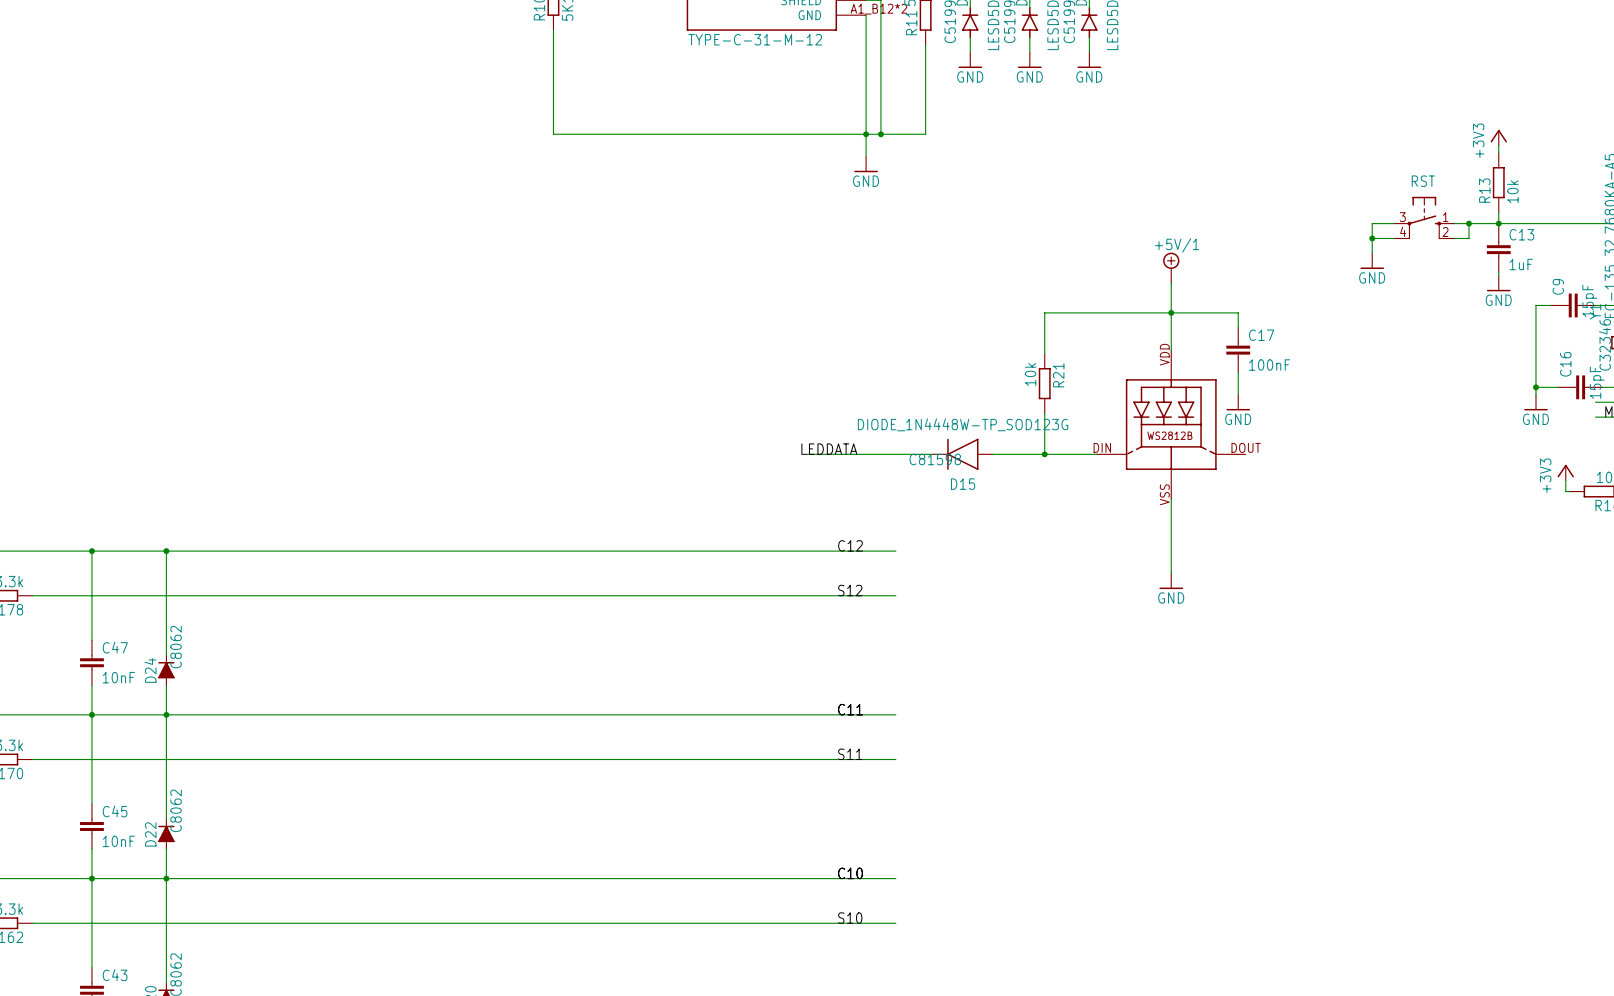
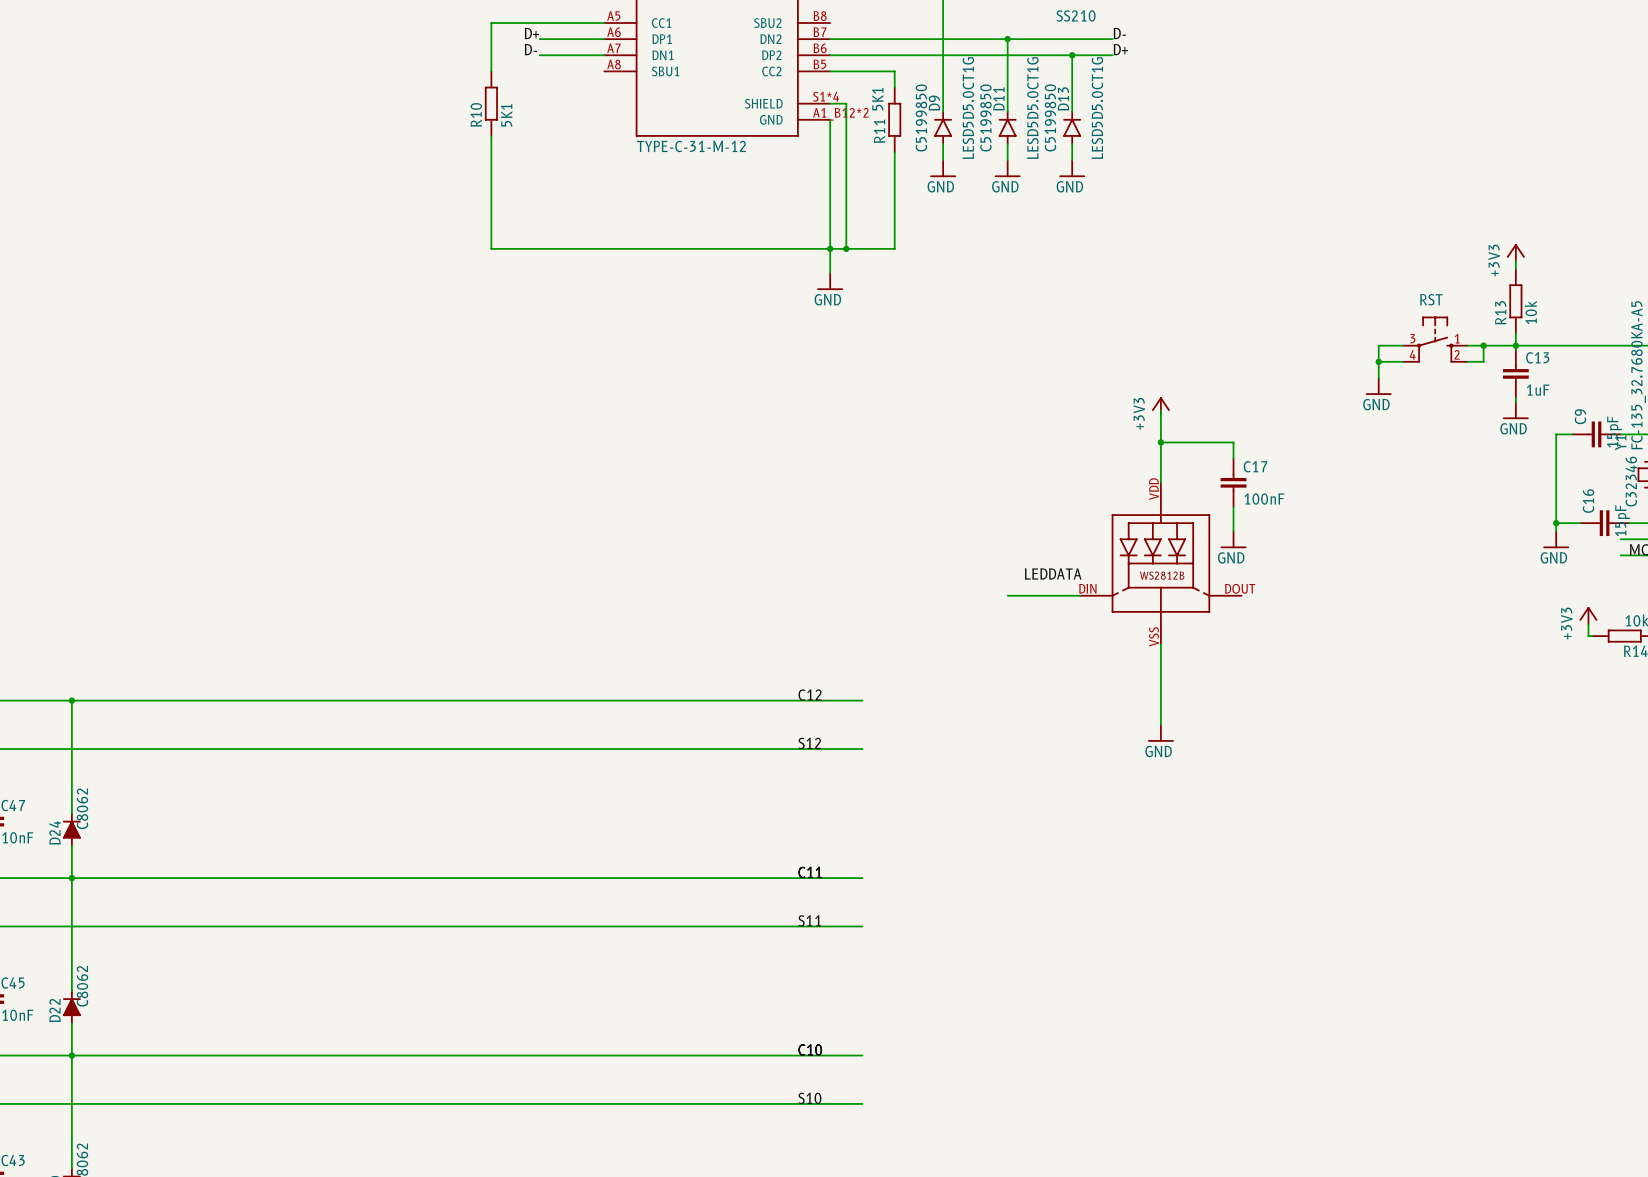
power symbol: +5V/1 (1171, 267) -> none
power symbol: none -> +3V3 (1160, 405)
wire: (1171, 312) (1044, 312) (1044, 353) -> none
R21: 10k (1044, 383) -> none
wire: (1044, 413) (1044, 454) -> none
label: none -> LEDDATA (1053, 573)
label: LEDDATA (829, 449) -> none
wire: (806, 454) (933, 454) -> none
D15: DIODE_1N4448W-TP_SOD123G (962, 454) -> none
wire: (992, 454) (1029, 454) -> none
junction: (1044, 454) -> none

